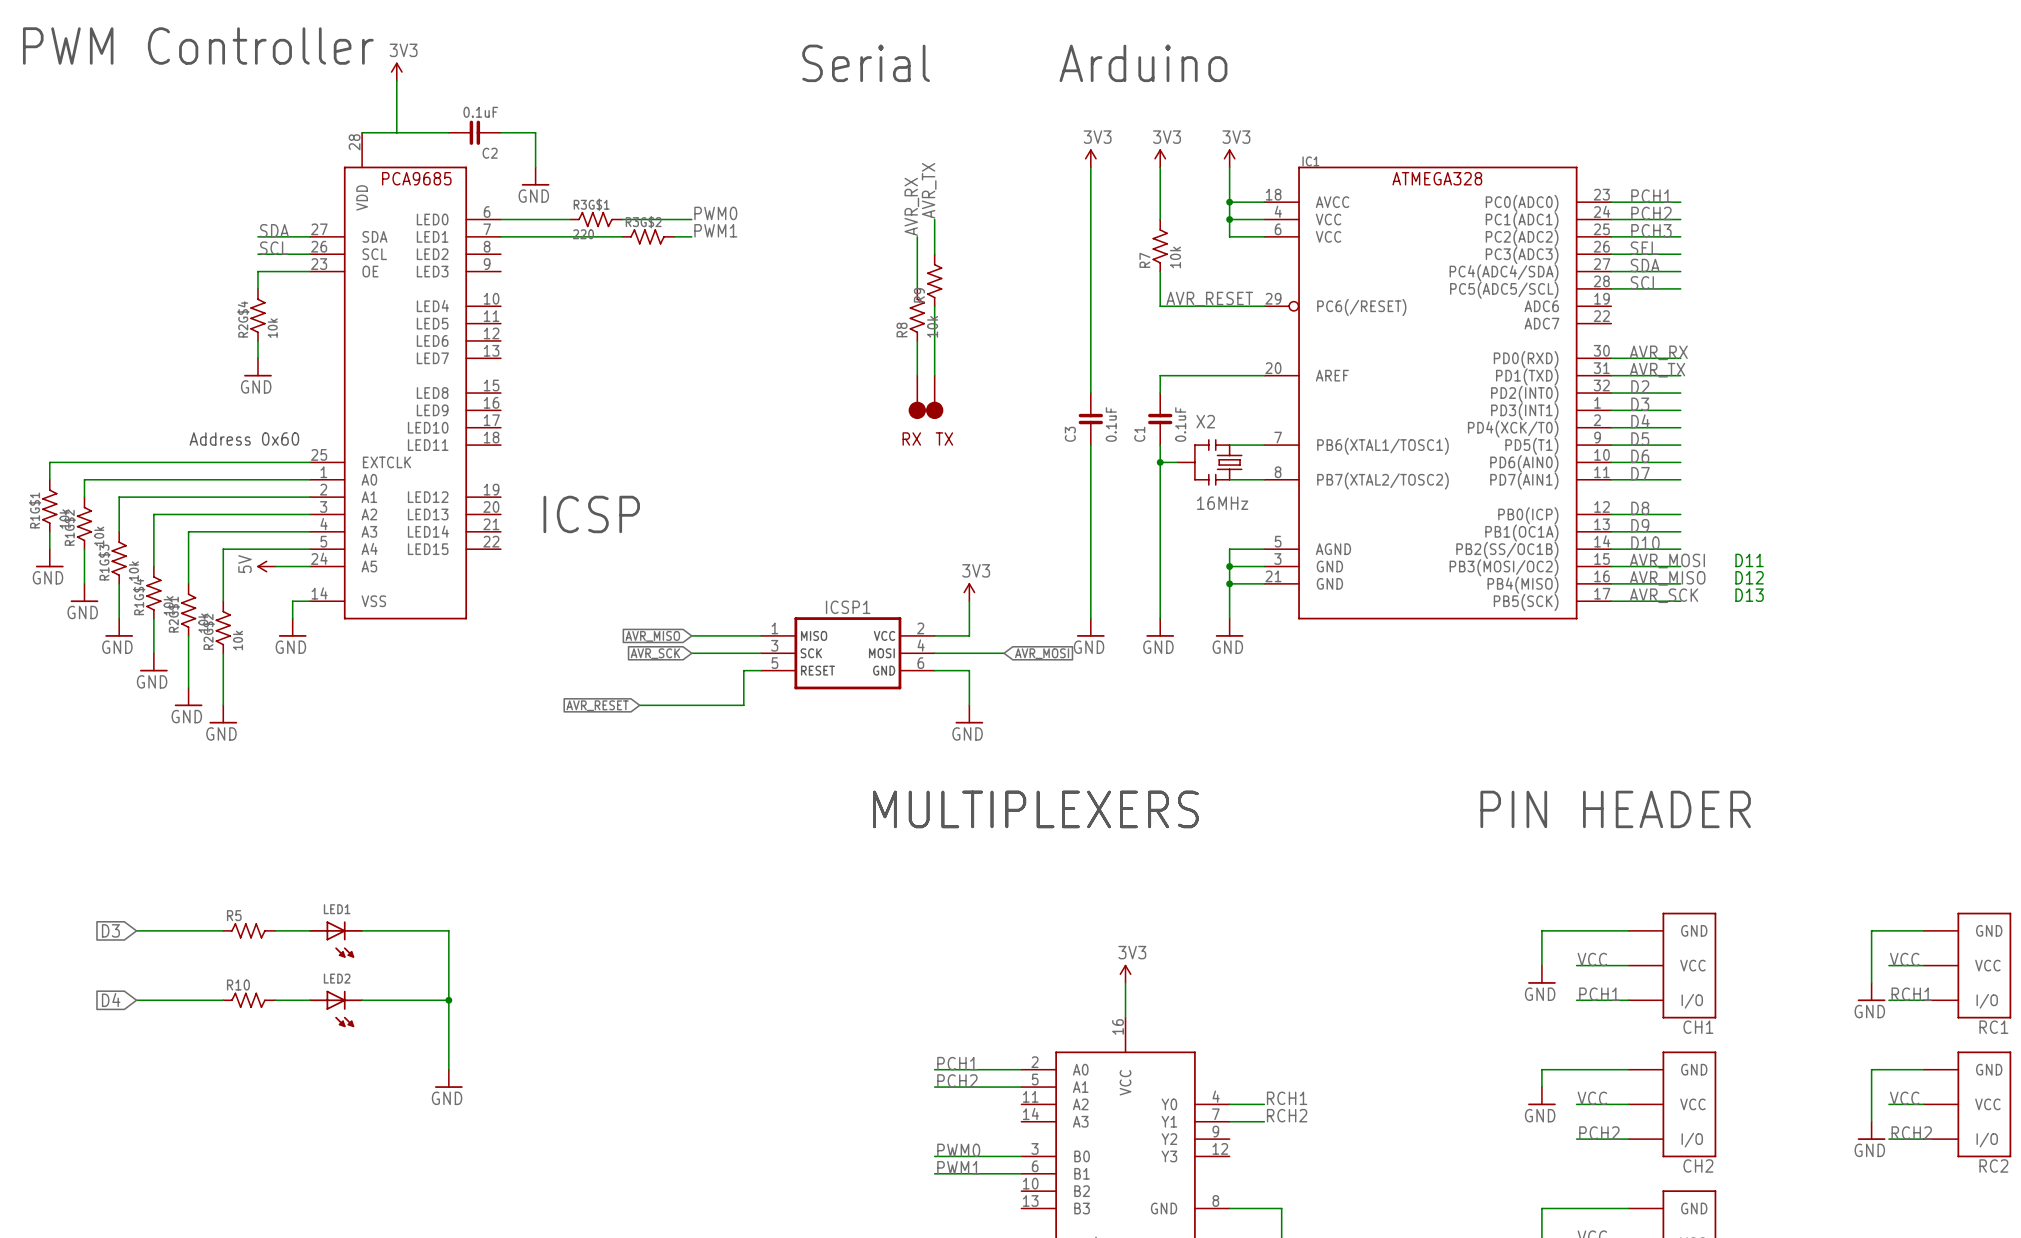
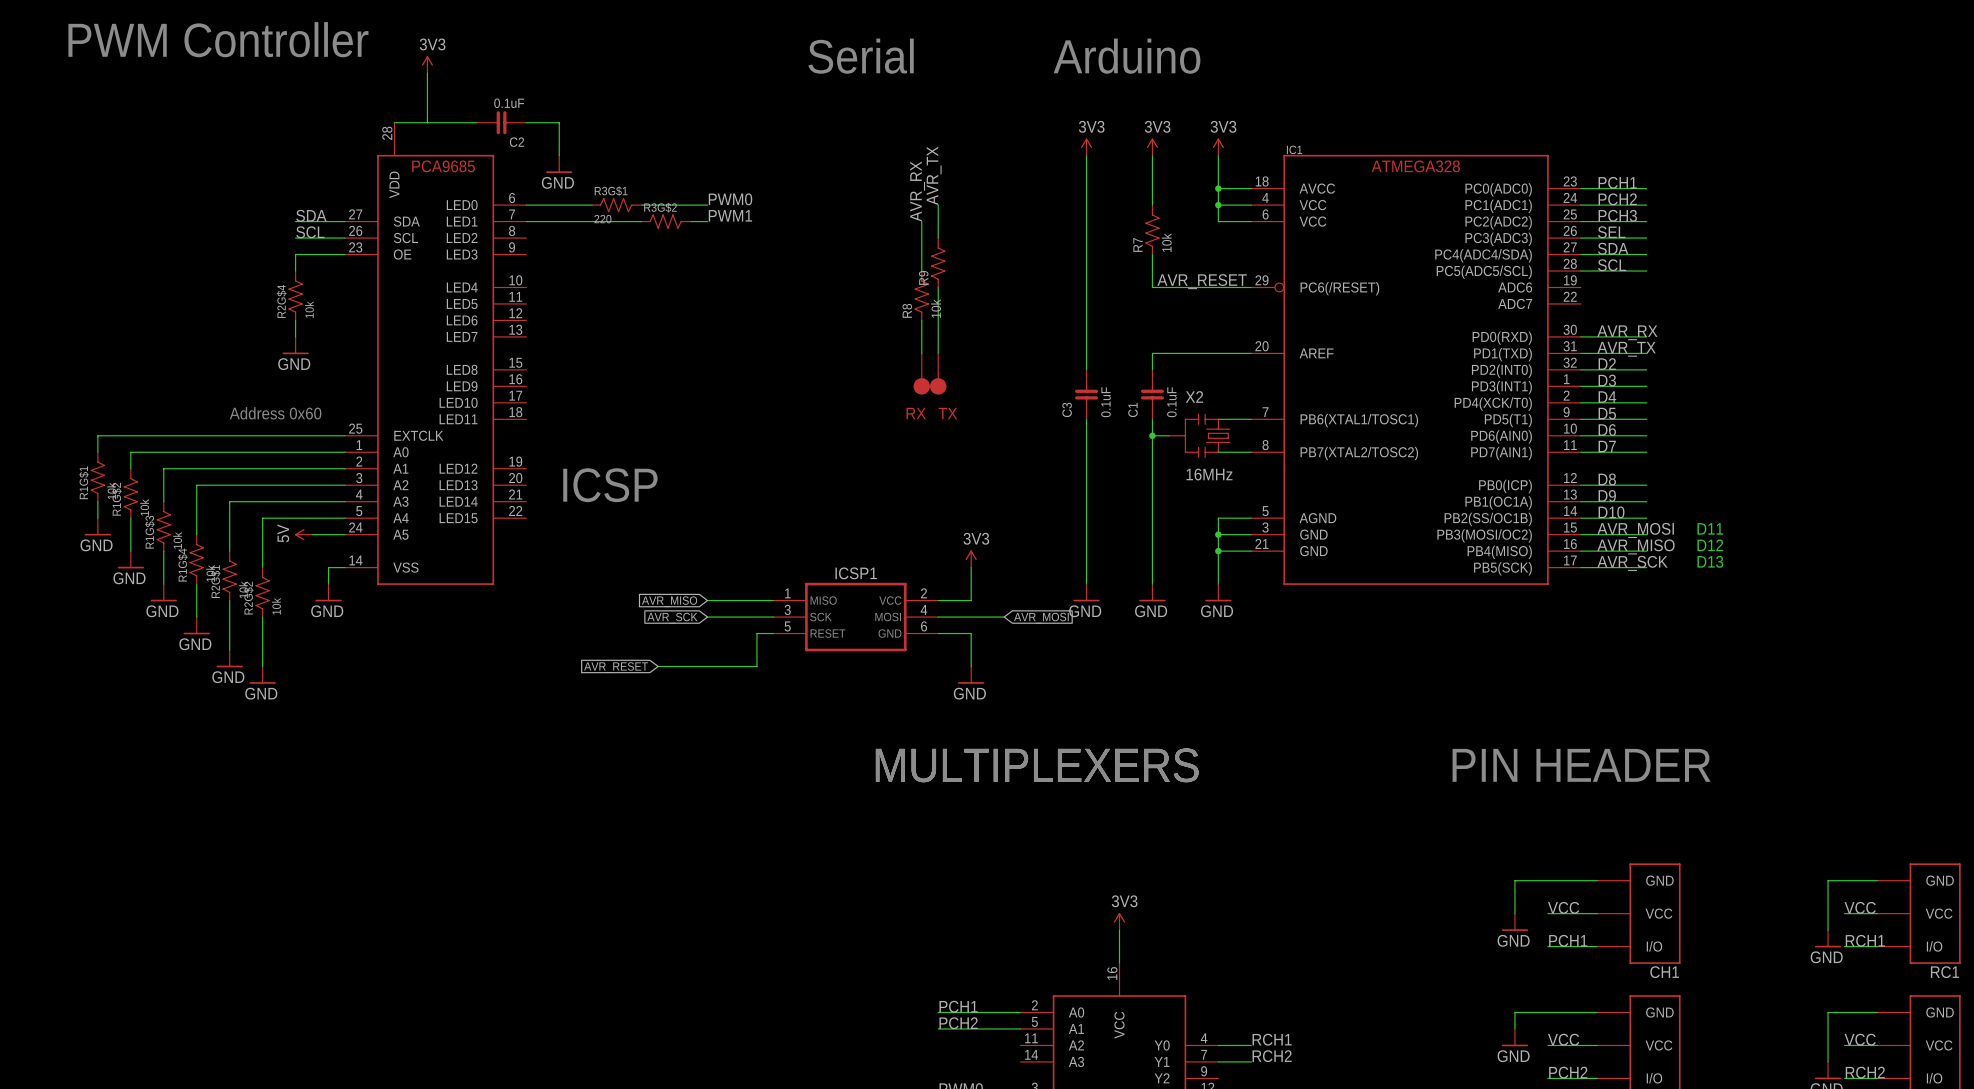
global label: D3 (110, 930) -> none
wire: (136, 930) (223, 930) -> none
R5: (249, 930) -> none
wire: (275, 930) (310, 930) -> none
wire: (362, 930) (448, 930) (448, 1069) -> none
LED1: (336, 939) -> none
global label: D4 (111, 1000) -> none
wire: (136, 1000) (223, 1000) -> none
R10: (249, 1000) -> none
wire: (275, 1000) (310, 1000) -> none
wire: (362, 1000) (448, 1000) -> none
junction: (448, 1000) -> none
LED2: (336, 1008) -> none
power symbol: GND (448, 1078) -> none

